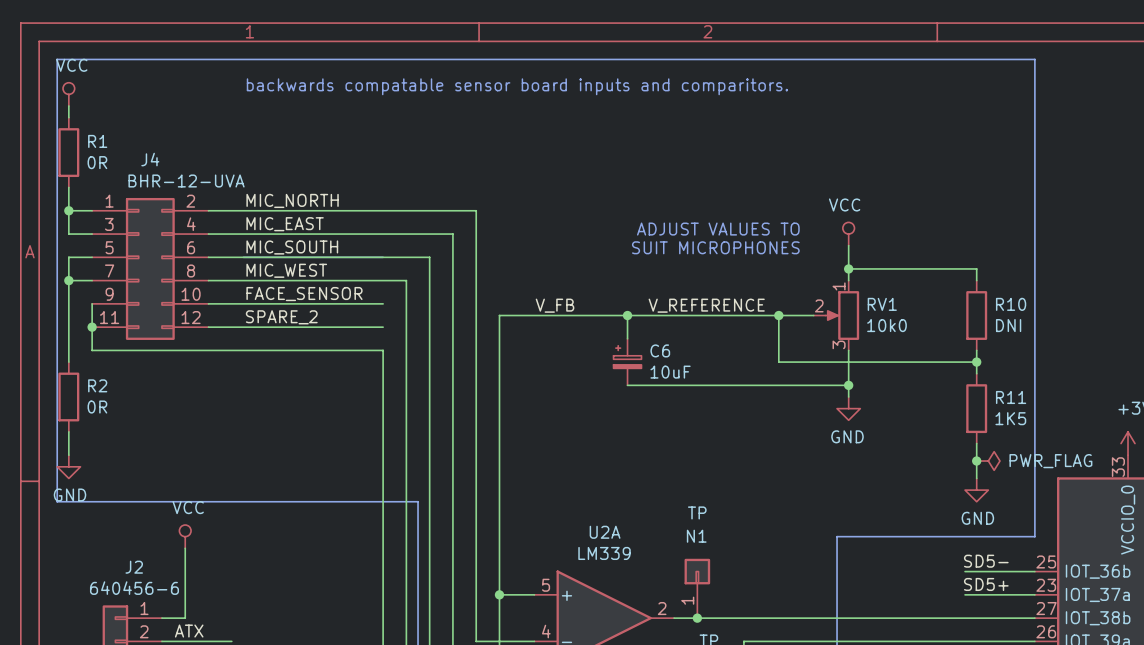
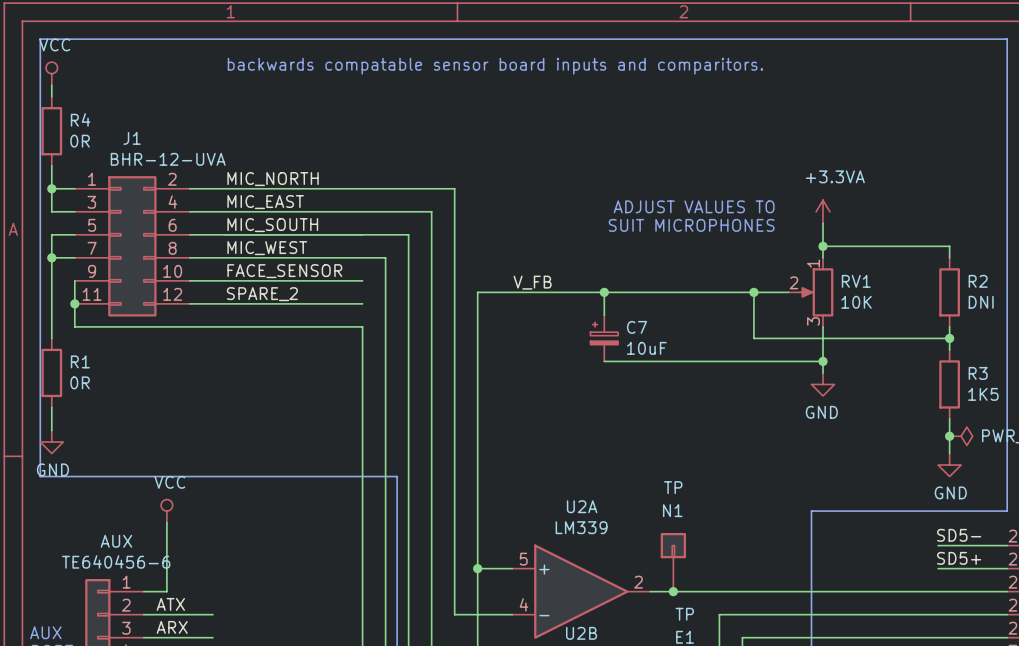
R1 name: R1 (97, 141) -> R4 (80, 119)
J4 name: J4 (150, 159) -> J1 (132, 138)
power symbol: VCC (848, 234) -> +3.3VA (823, 211)
R10 name: R10 (1011, 304) -> R2 (978, 281)
label: V_REFERENCE (706, 305) -> none
RV1 value: 10k0 (886, 325) -> 10K (856, 302)
C6 name: C6 (660, 350) -> C7 (636, 327)
R2 name: R2 (97, 385) -> R1 (80, 361)
R11 name: R11 (1011, 397) -> R3 (978, 373)
J2 name: J2 (134, 567) -> AUX (116, 541)
J2 value: 640456-6 (134, 588) -> TE640456-6 (116, 561)
N1 pin number: 1 (687, 600) -> none

